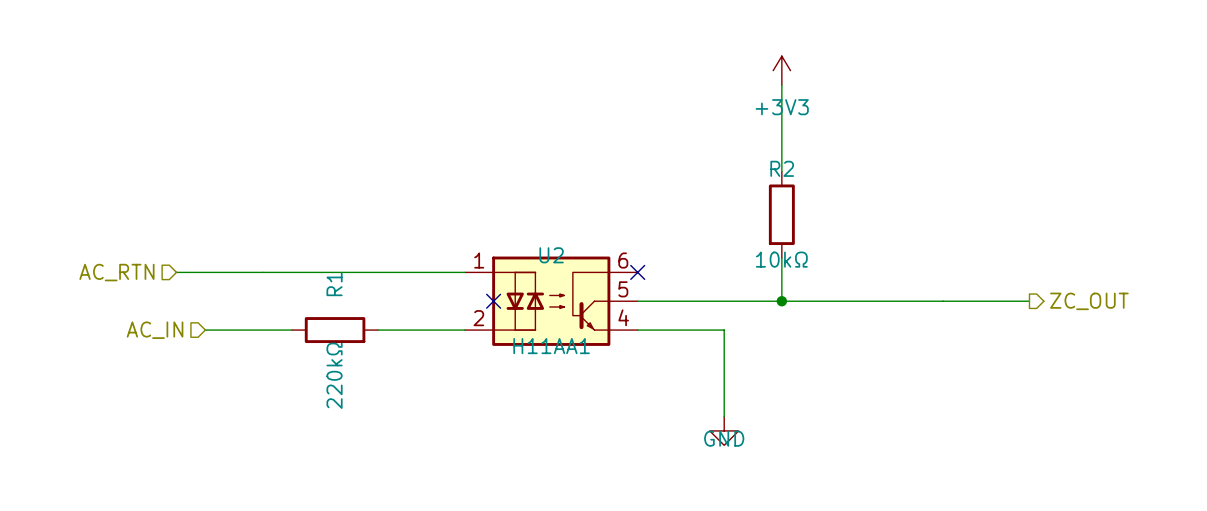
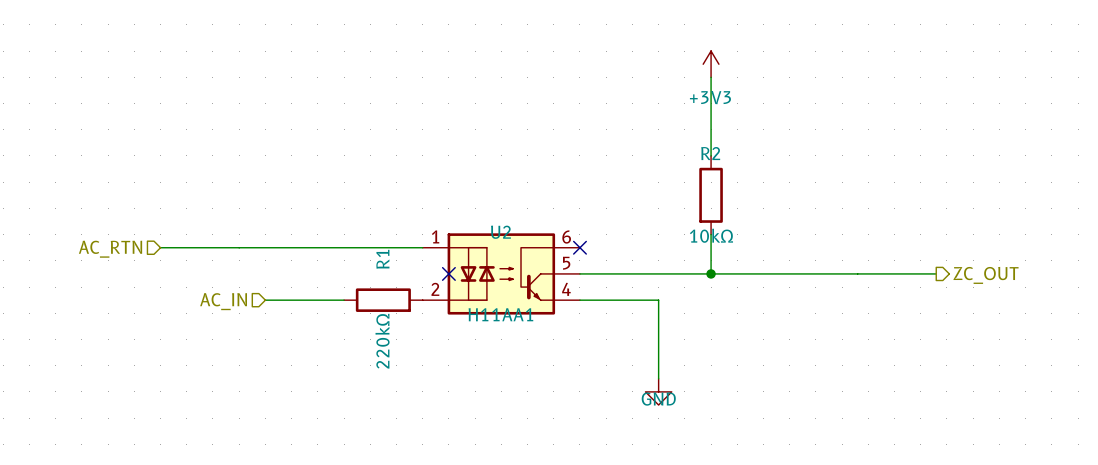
hierarchical label position: AC_IN (155, 330) -> AC_IN (223, 301)
wire: (205, 330) (291, 330) -> (344, 300) (265, 300)
R1 position: (335, 330) -> (383, 300)
wire: (378, 330) (464, 330) -> none

